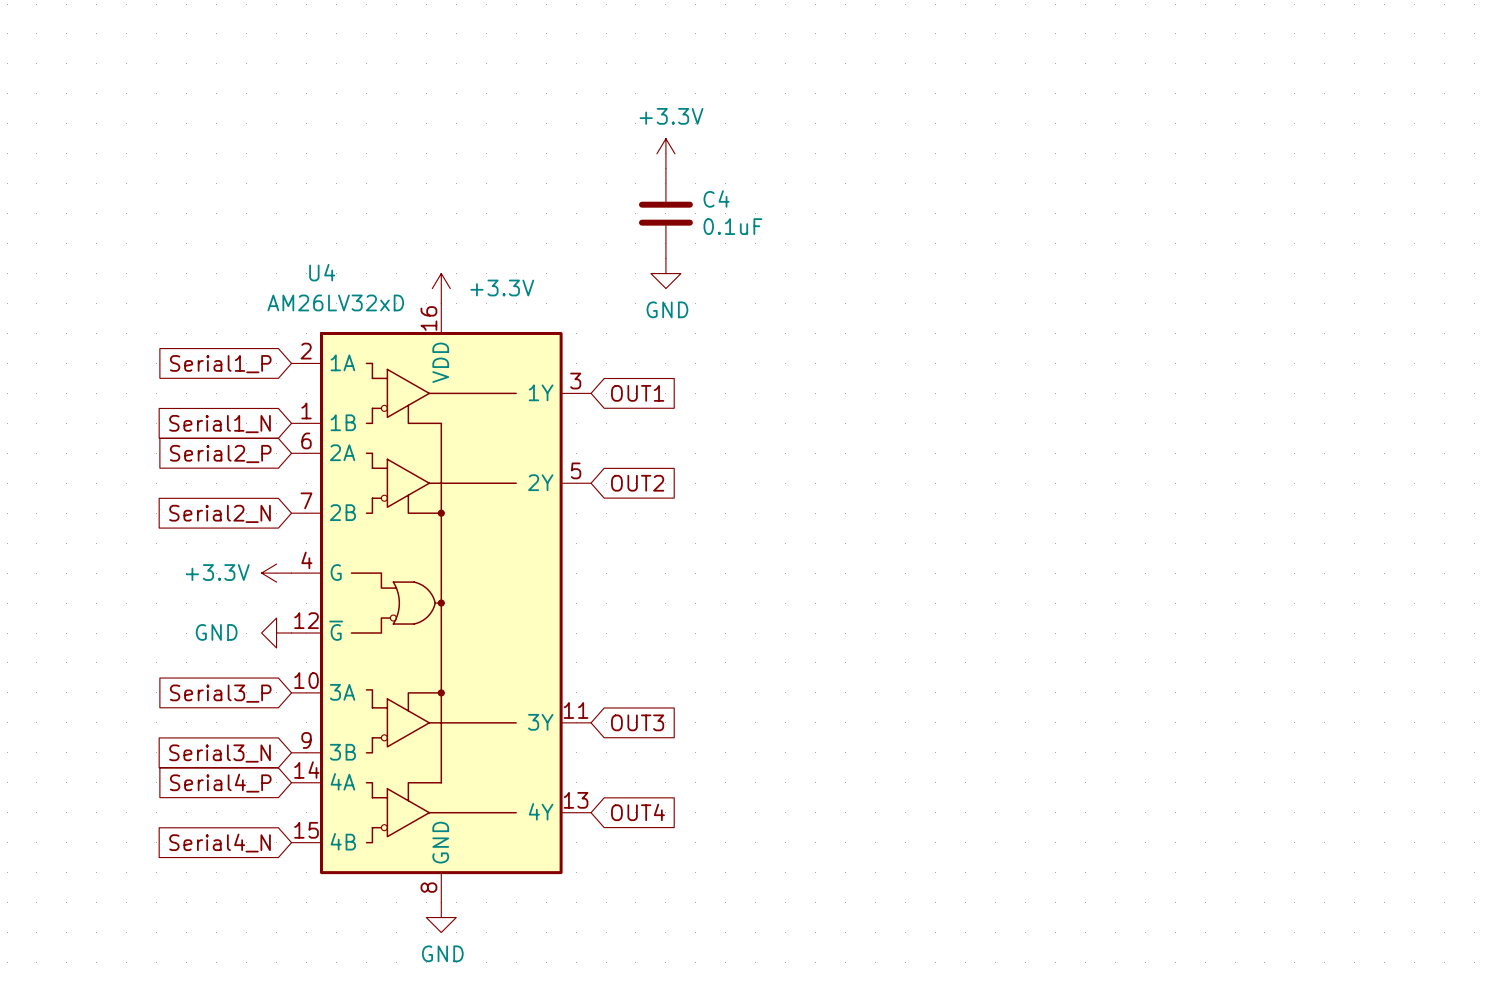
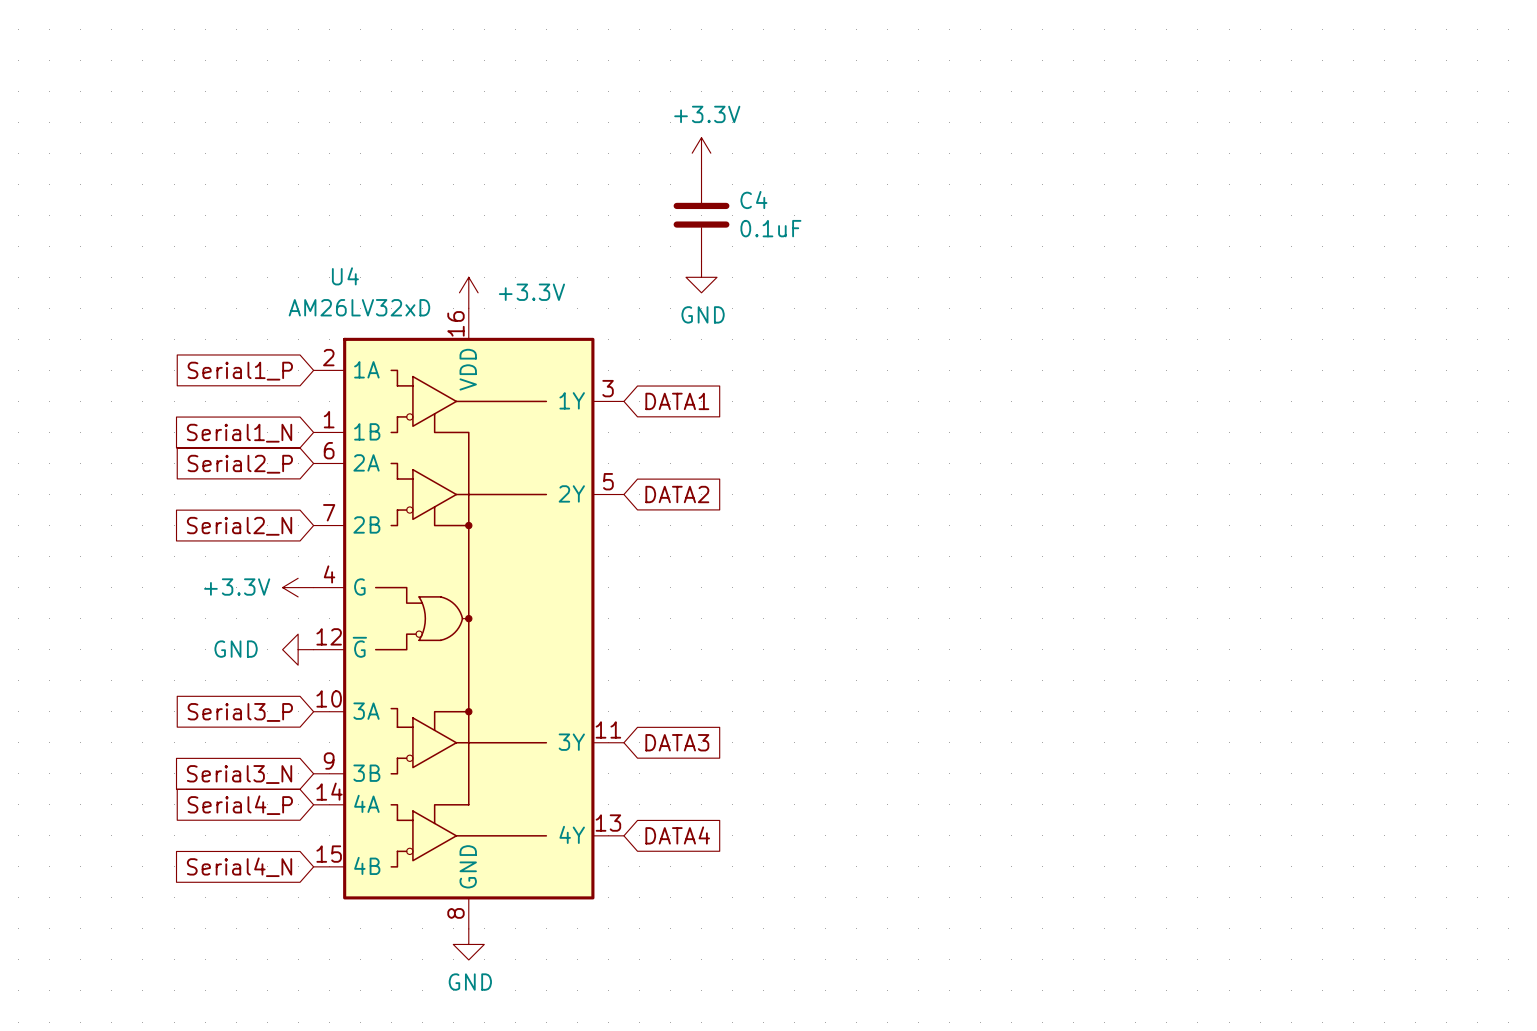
global label: OUT1 (637, 393) -> DATA1 (677, 401)
global label: OUT2 (637, 483) -> DATA2 (677, 494)
global label: OUT3 (637, 722) -> DATA3 (677, 742)
global label: OUT4 (637, 812) -> DATA4 (677, 835)

